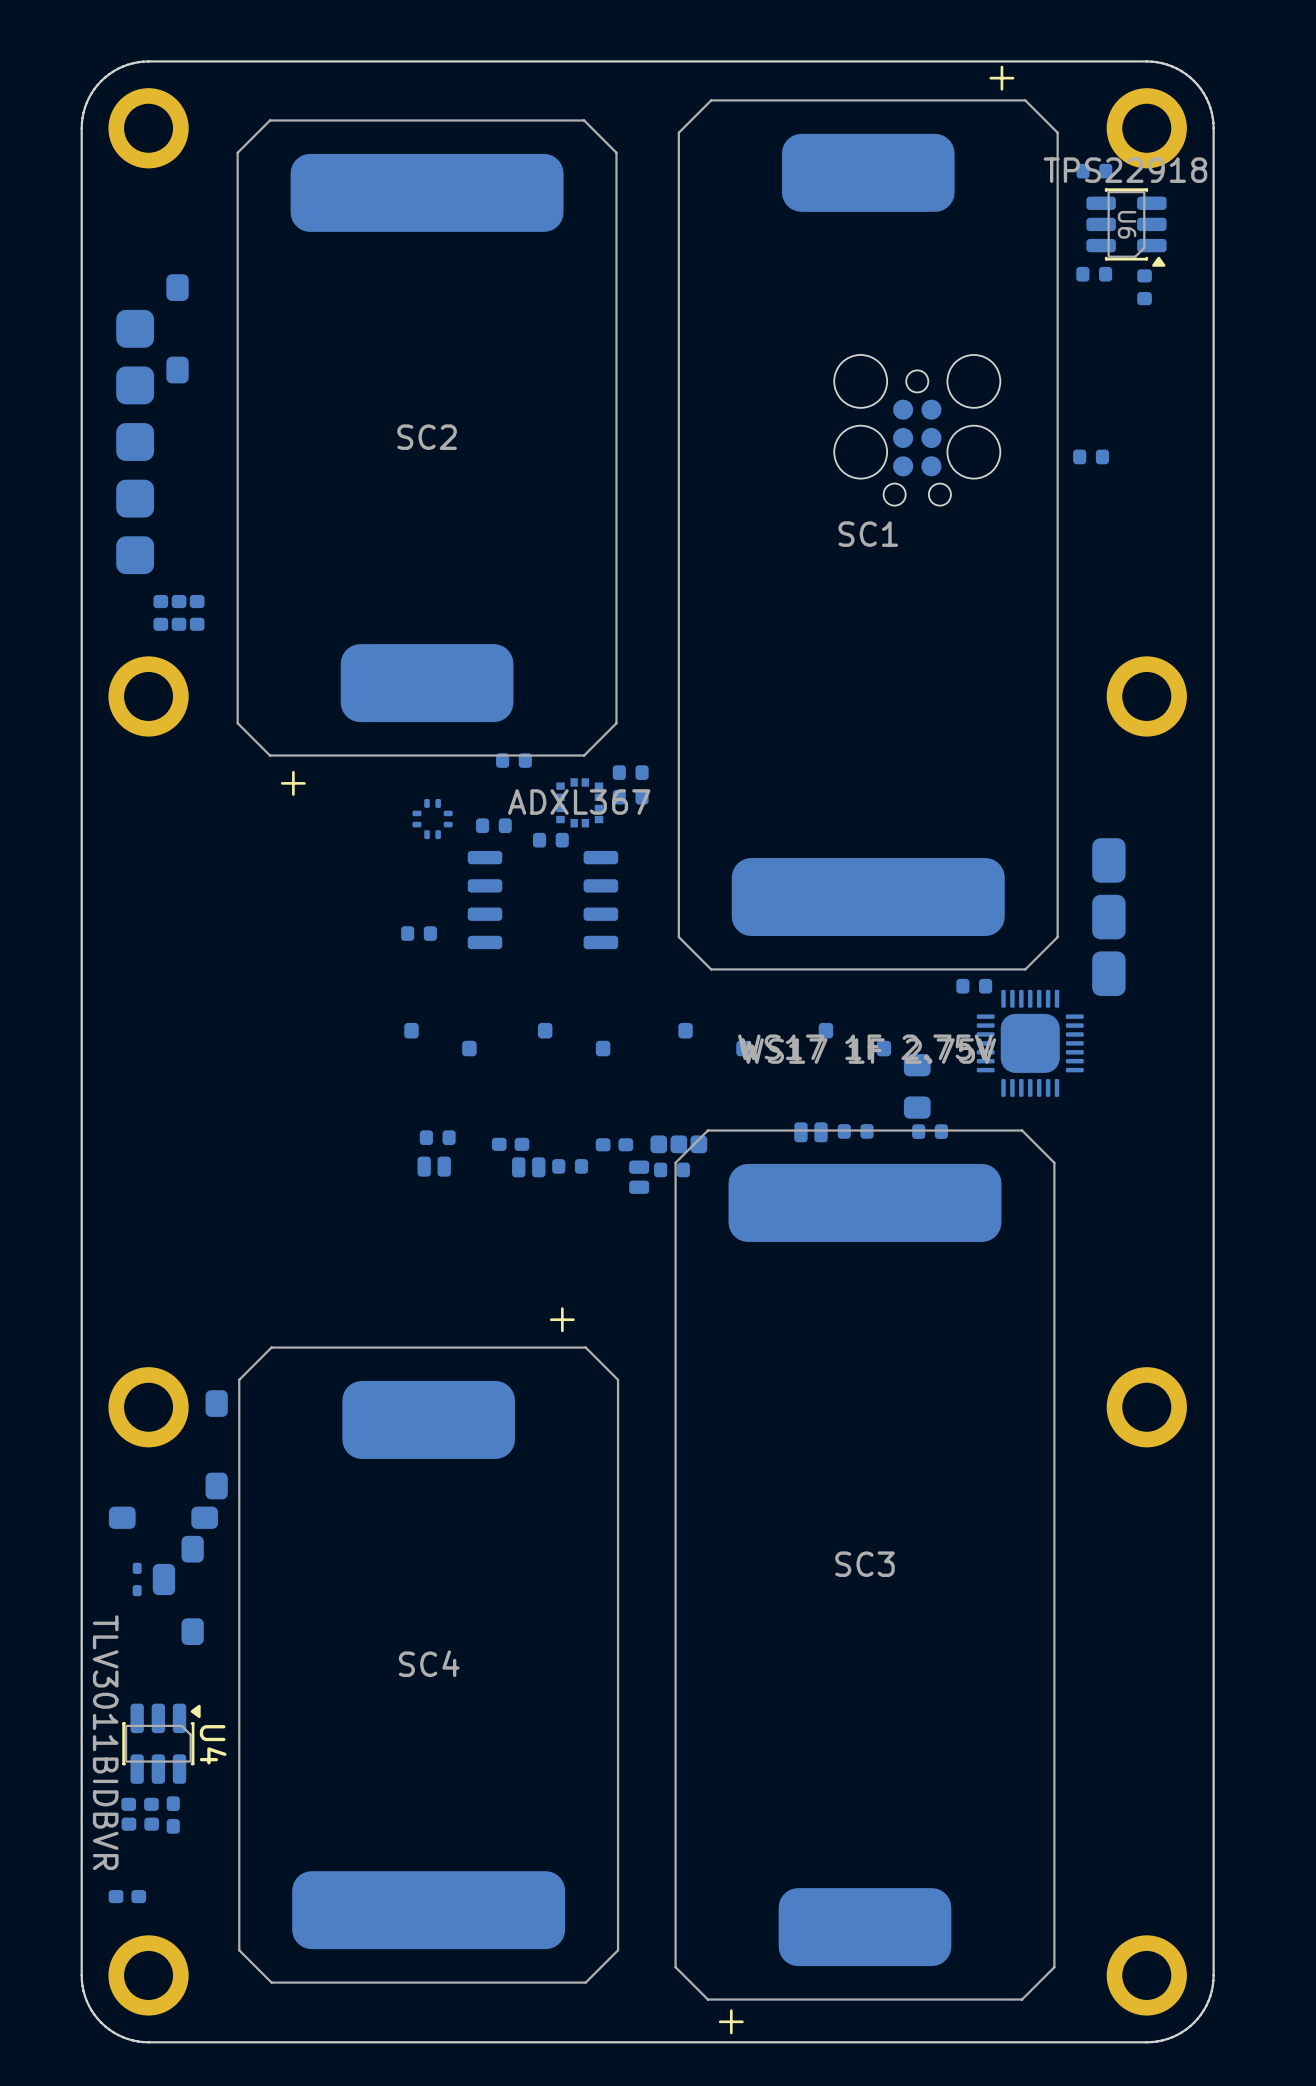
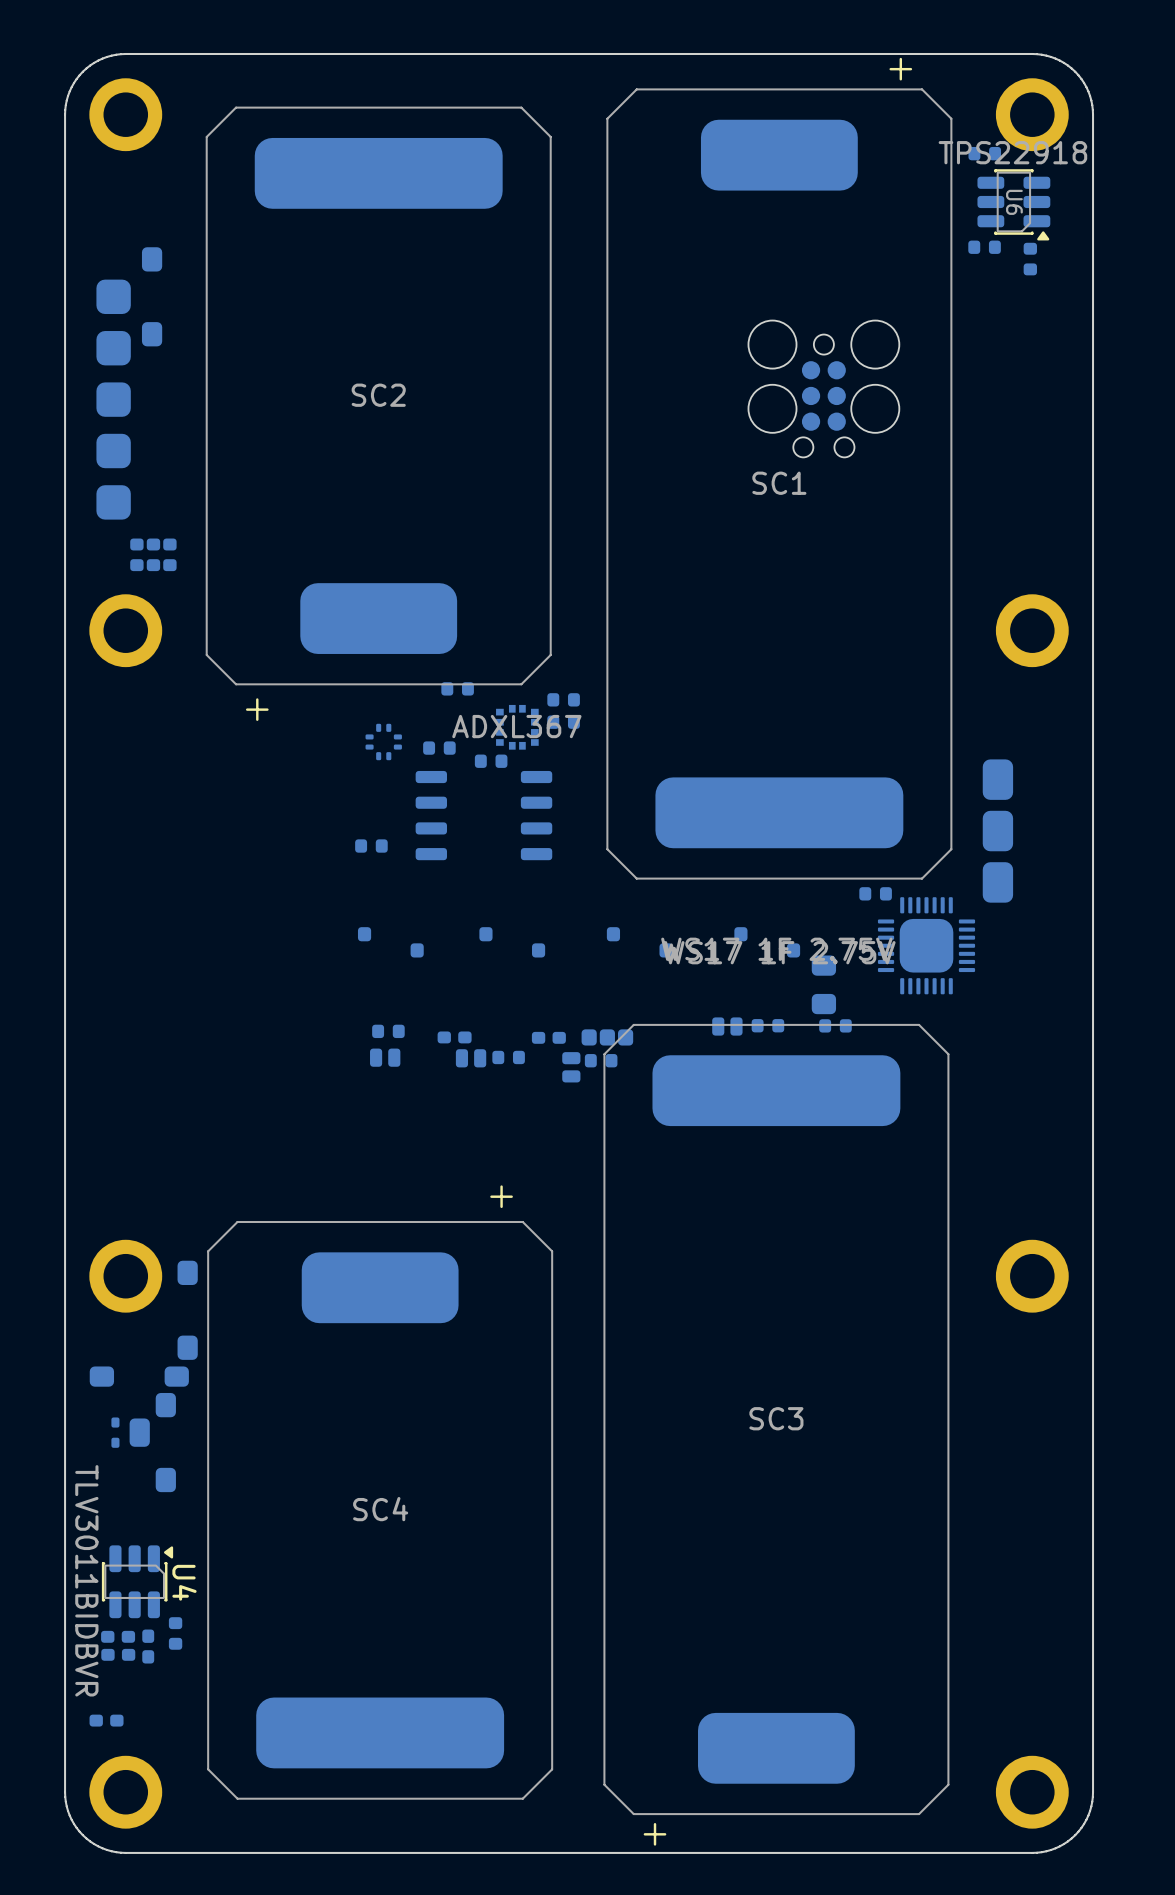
part: (1091, 456) -> none
part: none -> (175, 1633)

